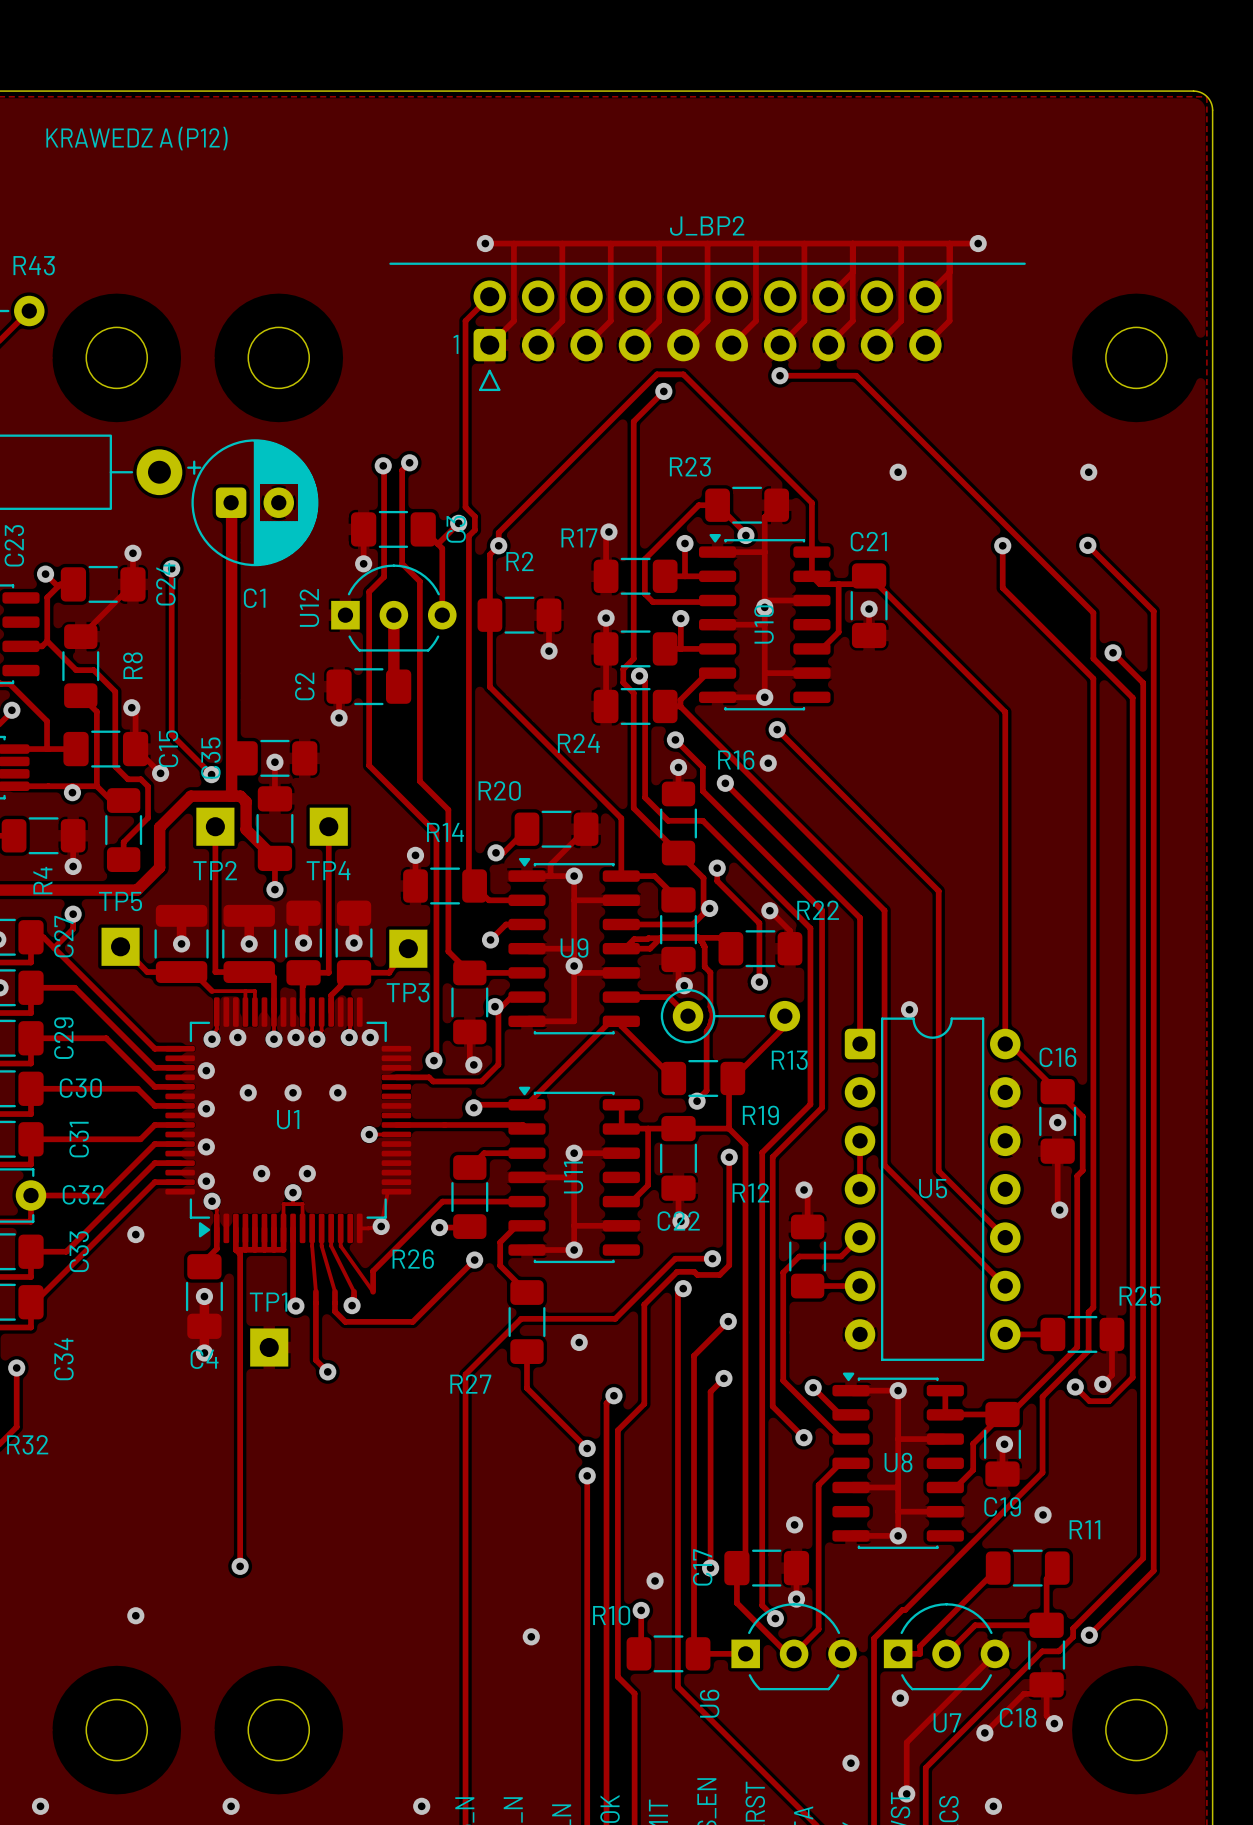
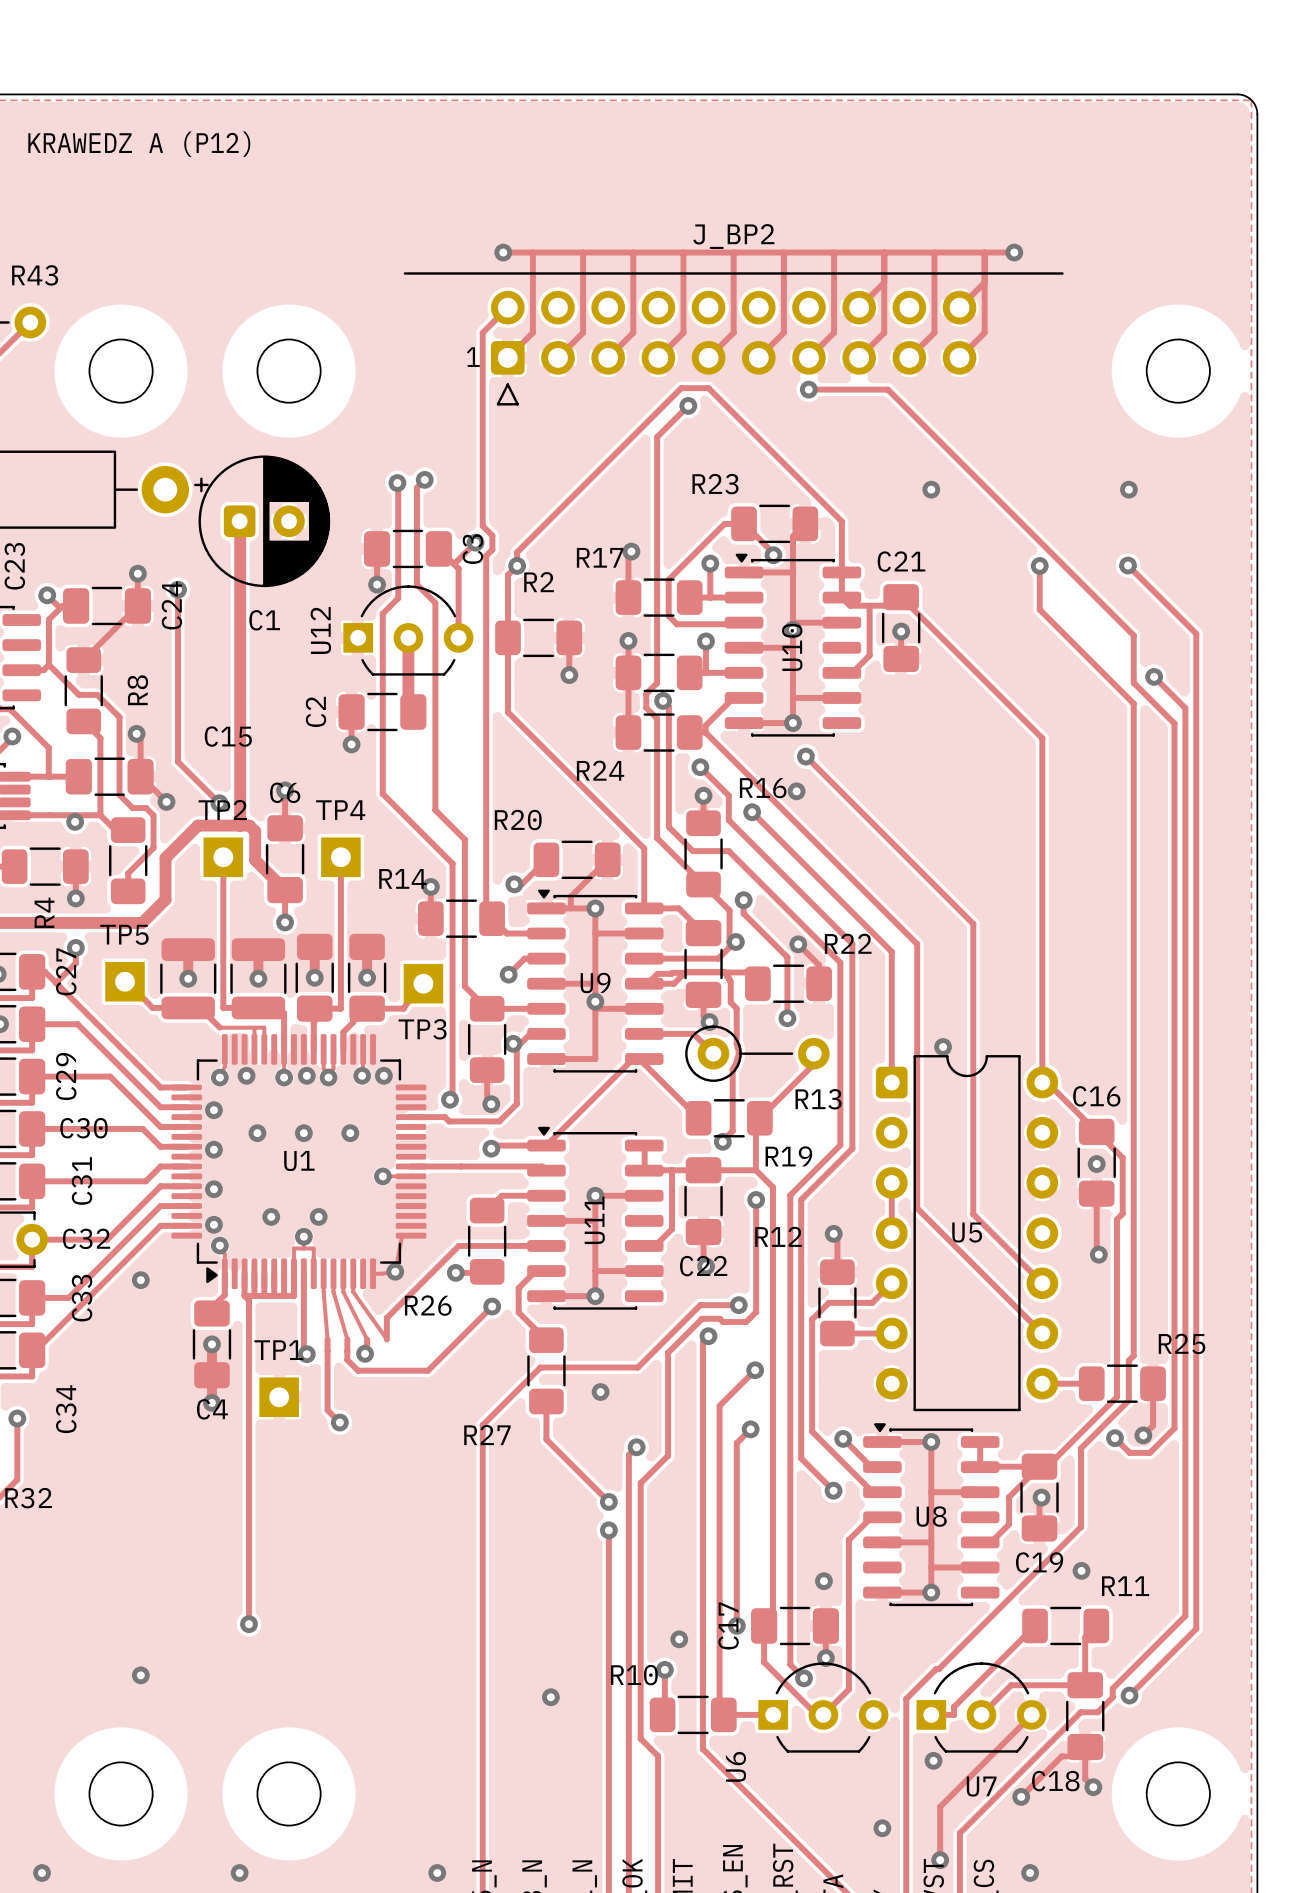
C15 name rotation: 0° (168, 748) -> 90° clockwise (228, 736)
C35: (274, 758) -> none
C6 name: none -> C6 (285, 792)
R14 name position: R14 (445, 832) -> R14 (402, 878)
TP2 name position: TP2 (215, 870) -> TP2 (222, 809)
TP4 name position: TP4 (328, 870) -> TP4 (340, 810)

